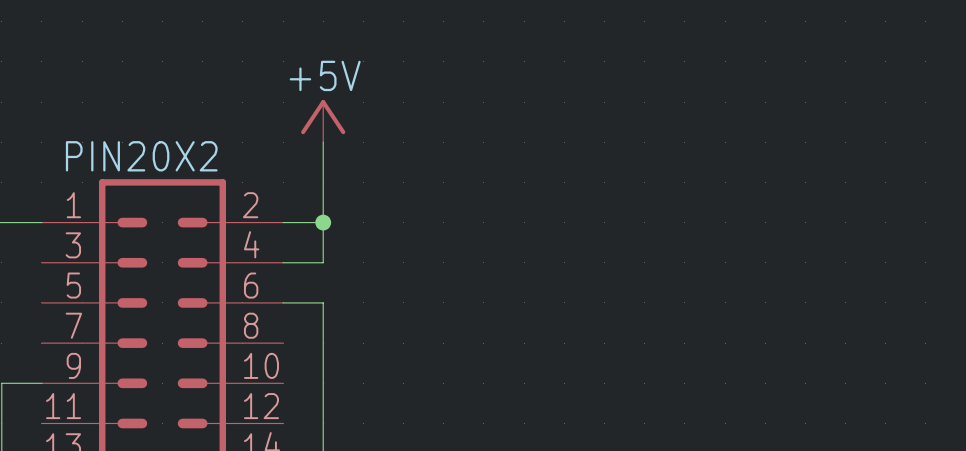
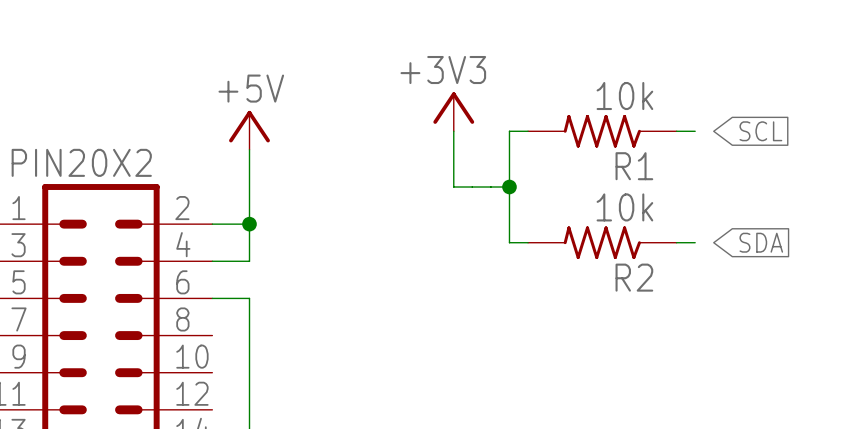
power symbol: none -> +3V3 (453, 111)
wire: none -> (453, 131) (453, 187) (509, 187)
wire: none -> (528, 131) (509, 131) (509, 242) (528, 242)
R1: none -> 10k (602, 131)
wire: none -> (676, 131) (695, 131)
global label: none -> SCL (760, 131)
junction: none -> (509, 187)
R2: none -> 10k (602, 242)
wire: none -> (676, 242) (695, 242)
global label: none -> SDA (761, 242)

